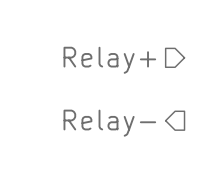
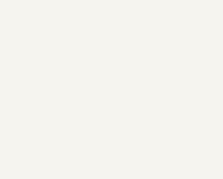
hierarchical label: Relay+ (109, 60) -> none
hierarchical label: Relay- (109, 123) -> none

